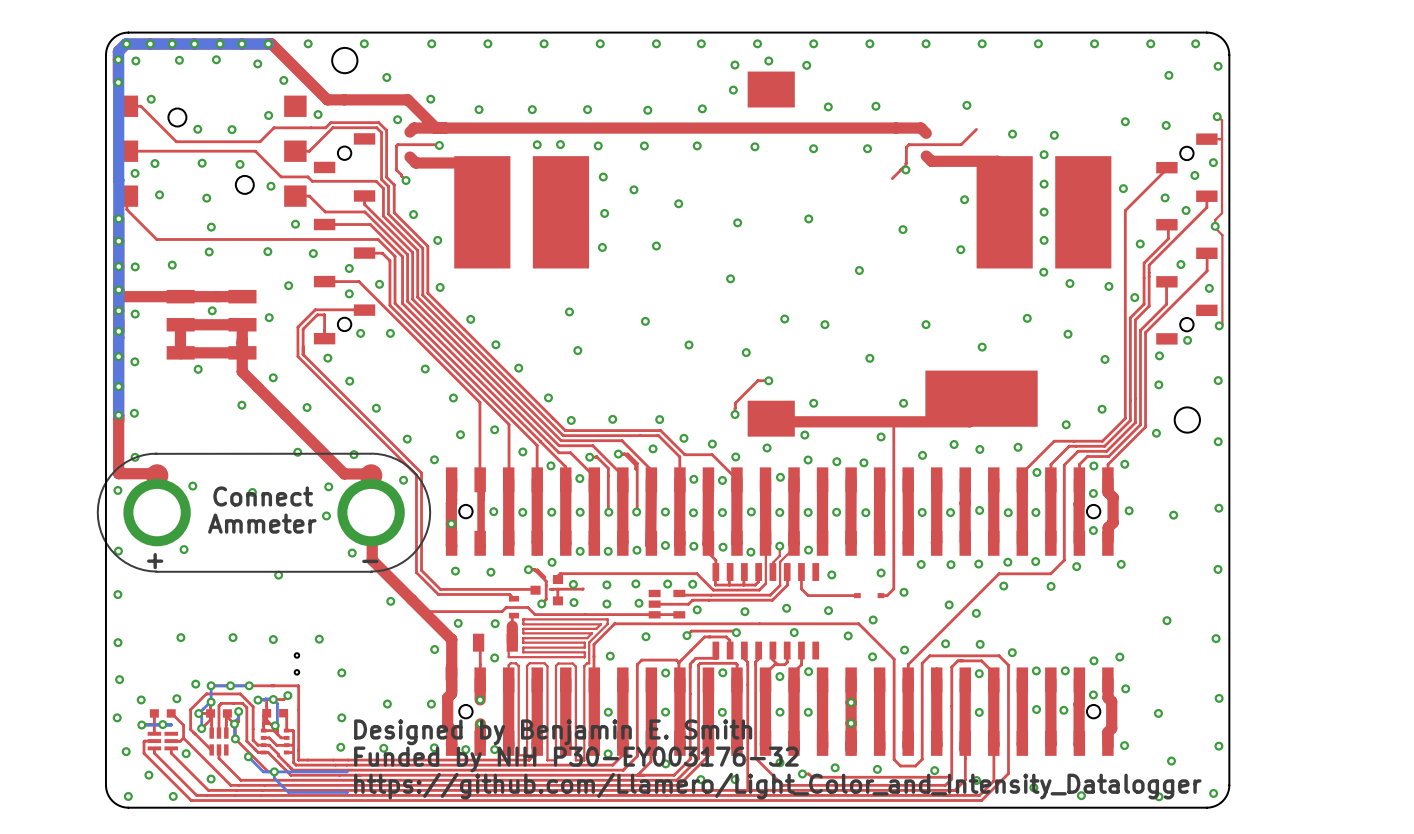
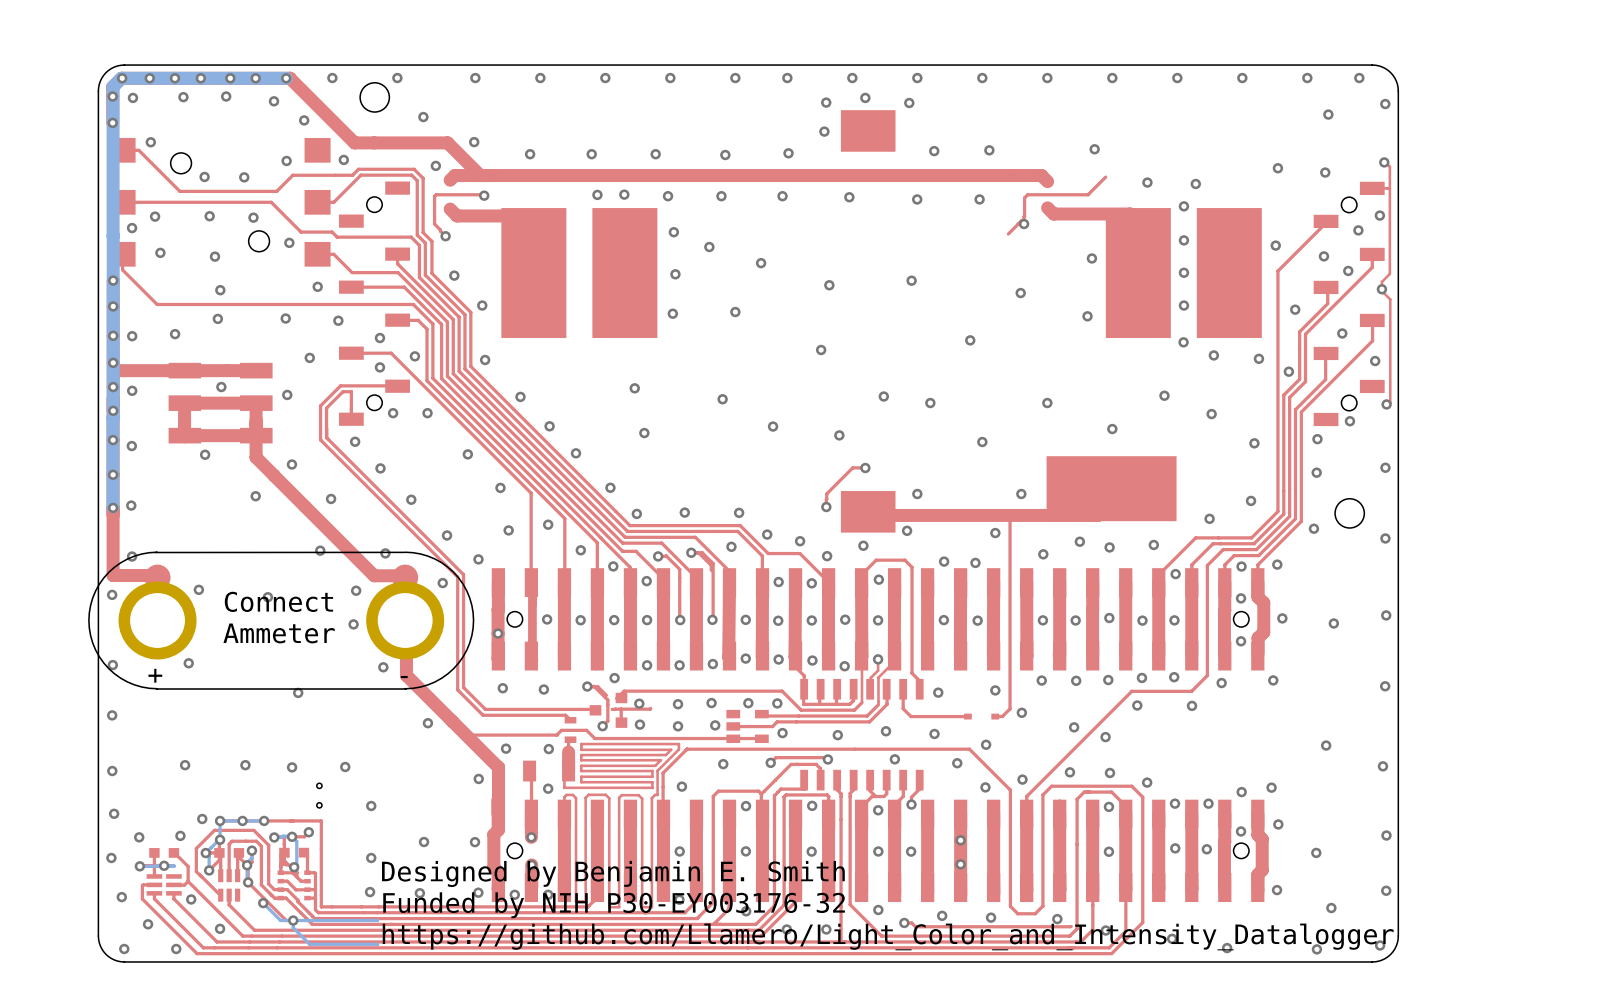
via: (808, 460) -> none
top track: none -> (861, 582) (861, 574) (876, 560) (904, 560) (912, 567) (912, 673) (919, 681) (919, 689)
via: (808, 512) -> none
via: (808, 550) -> none
top track: none -> (919, 780) (919, 789) (911, 797) (911, 804)

